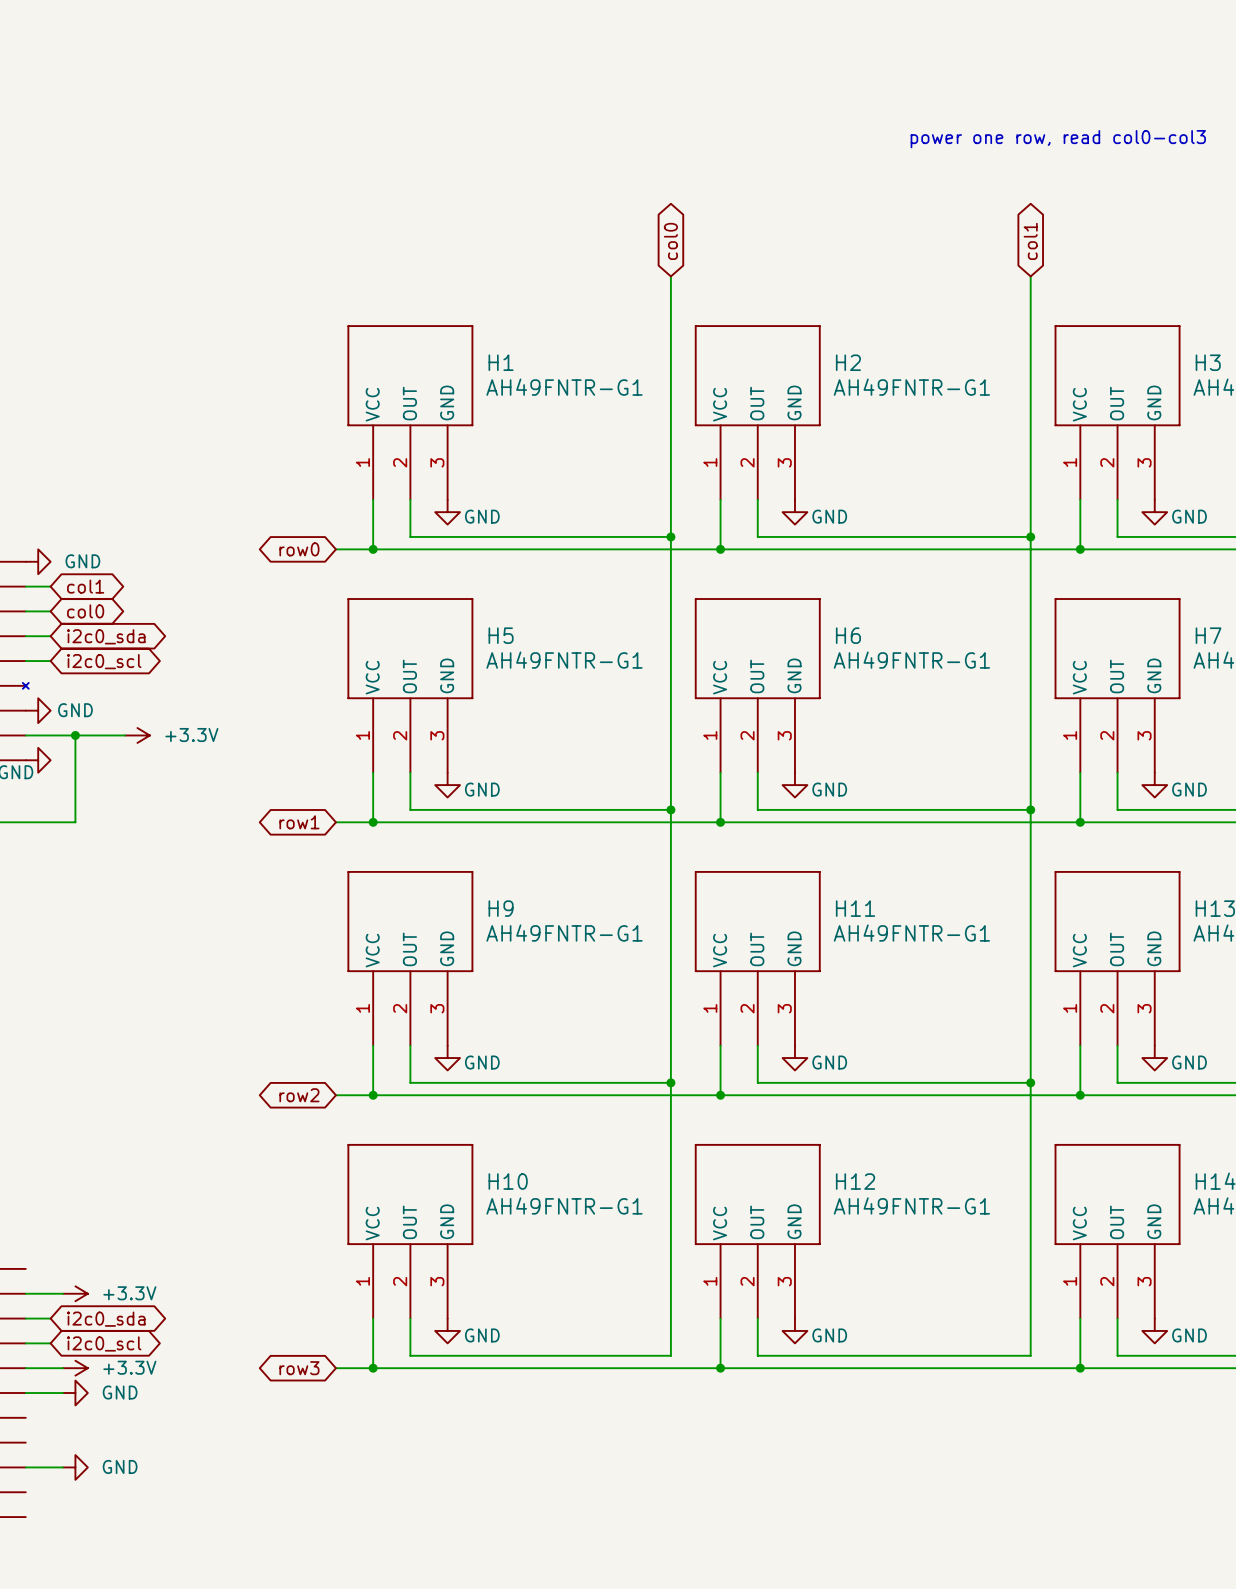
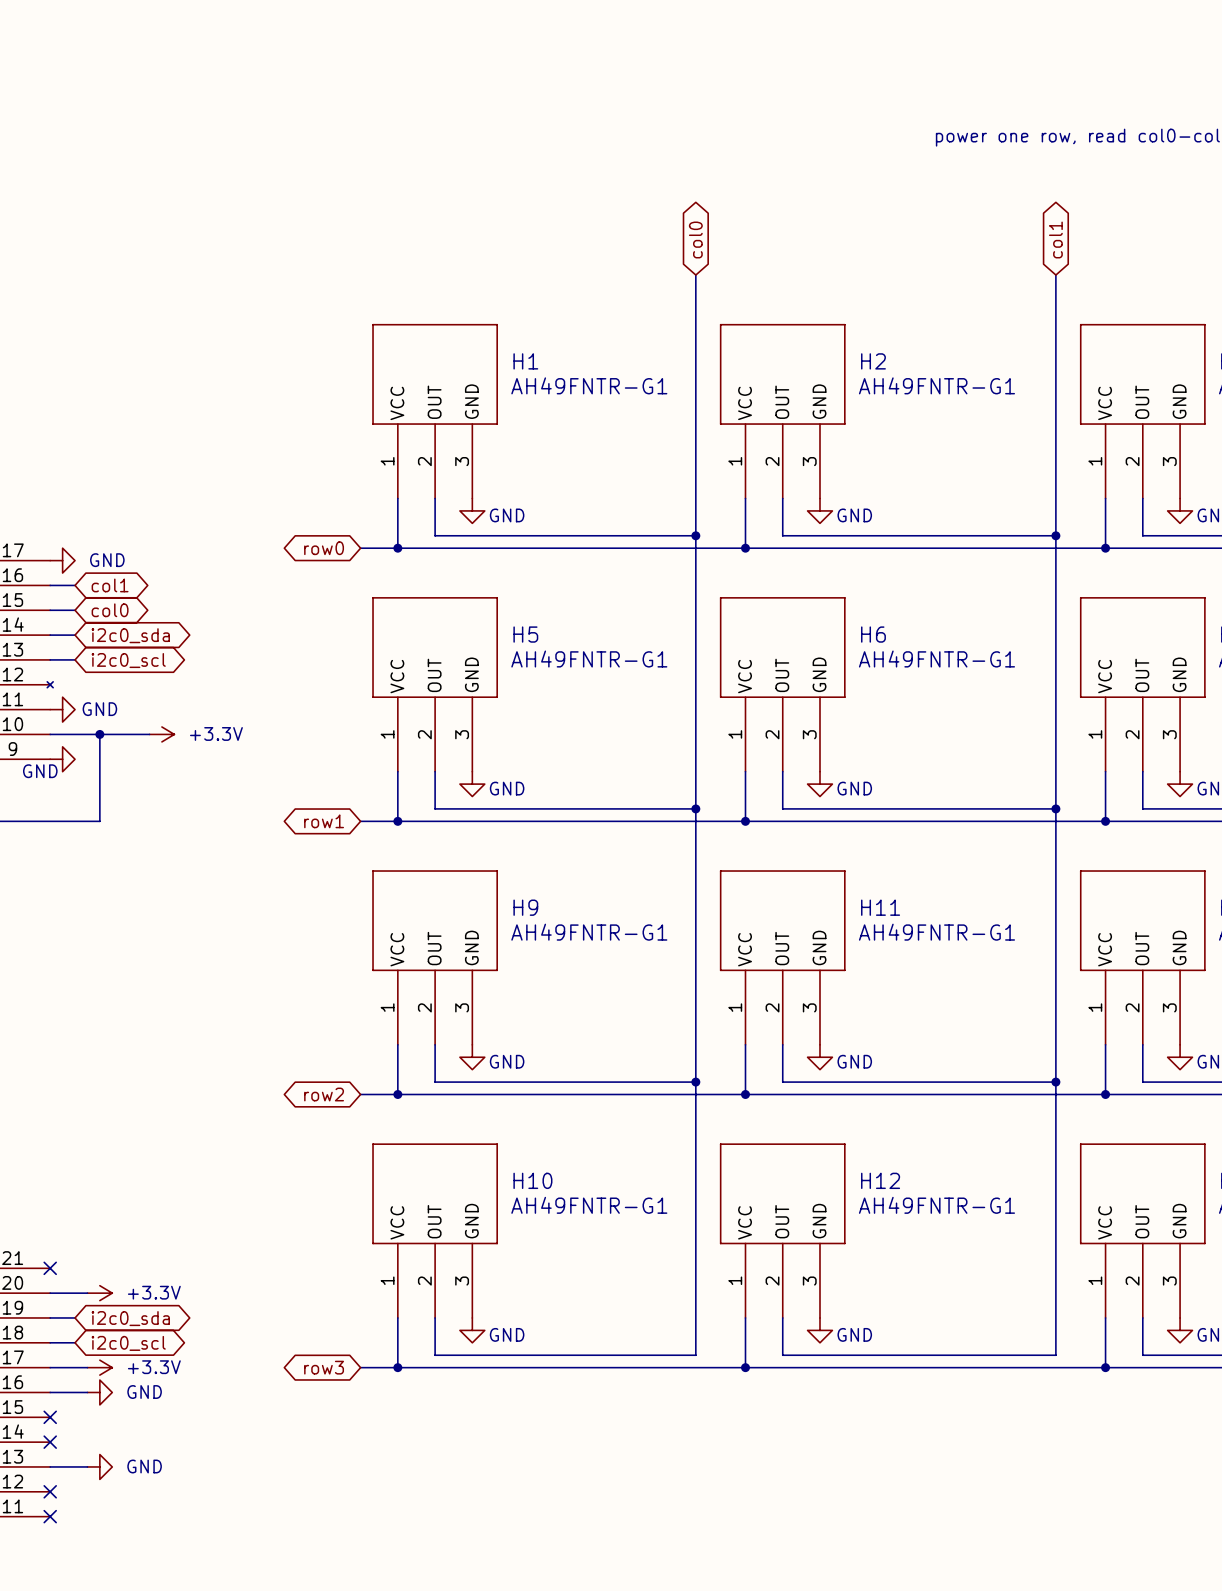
no-connect mark: none -> (50, 1268)
no-connect mark: none -> (50, 1417)
no-connect mark: none -> (50, 1442)
no-connect mark: none -> (50, 1491)
no-connect mark: none -> (50, 1516)

